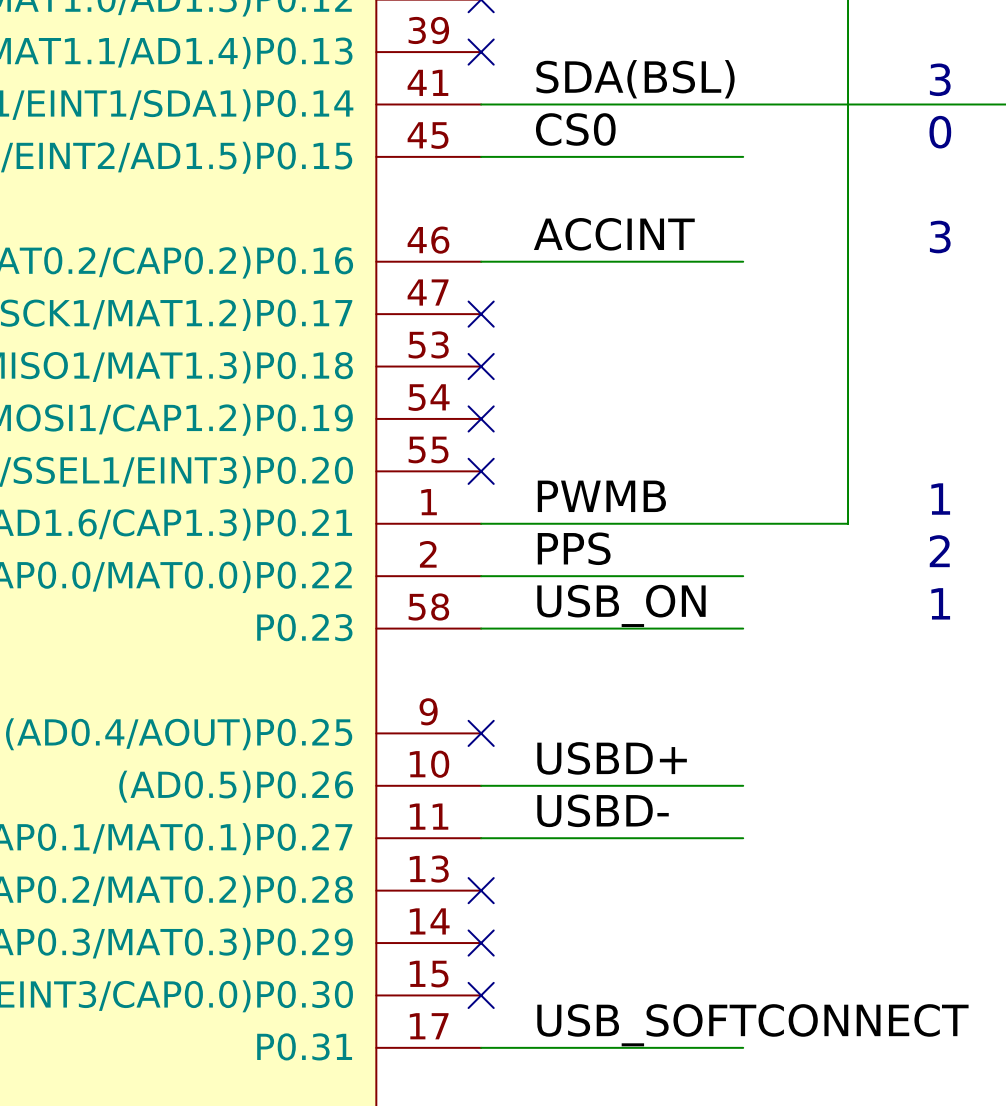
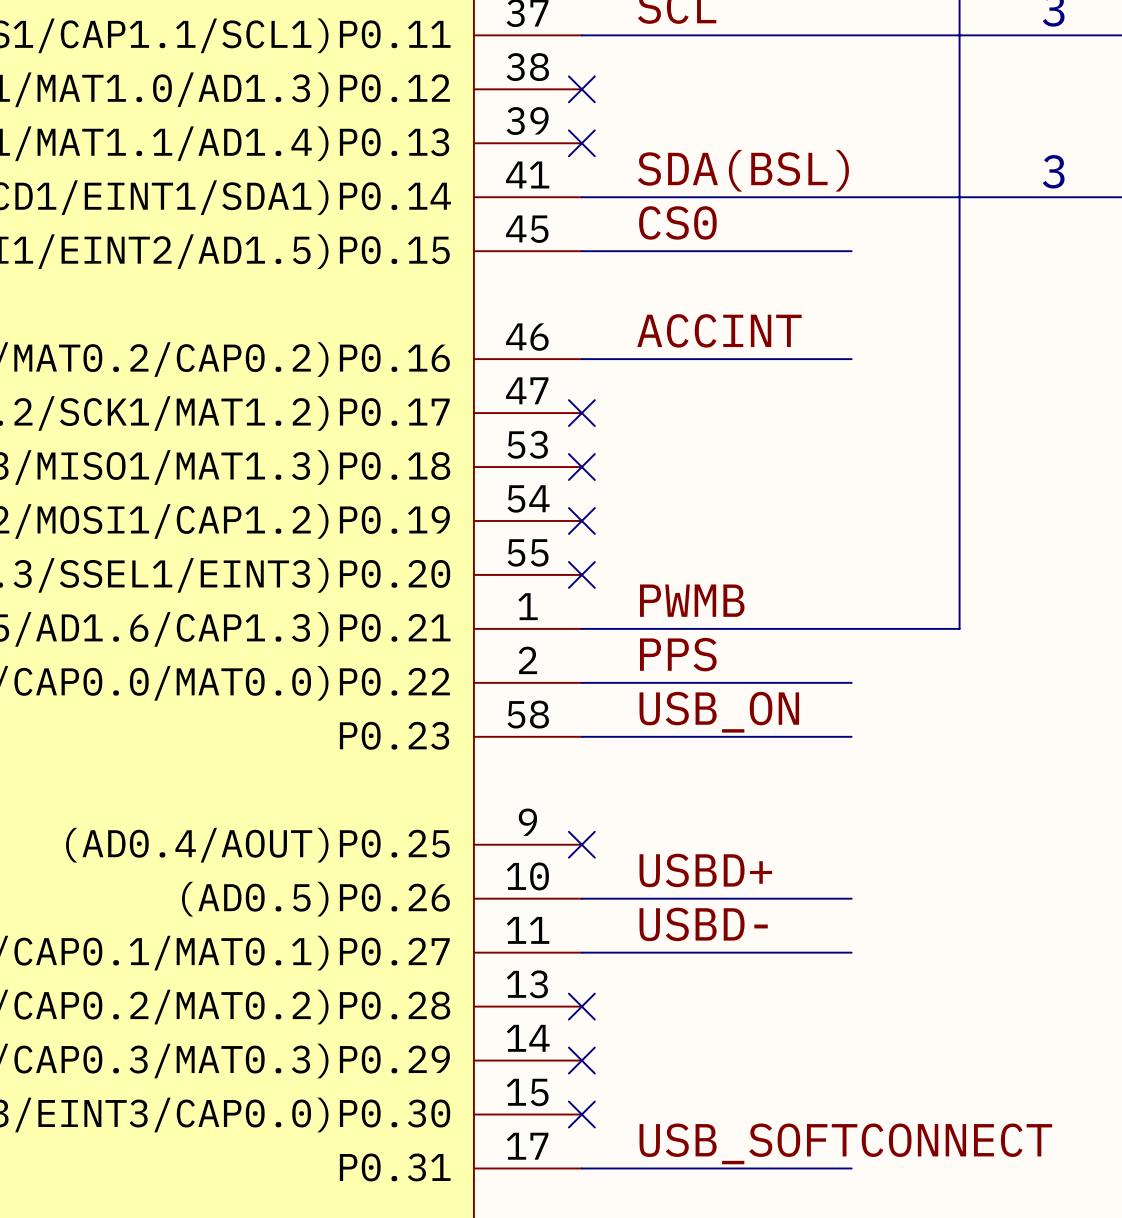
text: 0 (940, 132) -> none
text: 3 (940, 237) -> none
text: 1 (940, 499) -> none
text: 2 (939, 551) -> none
text: 1 (940, 603) -> none

